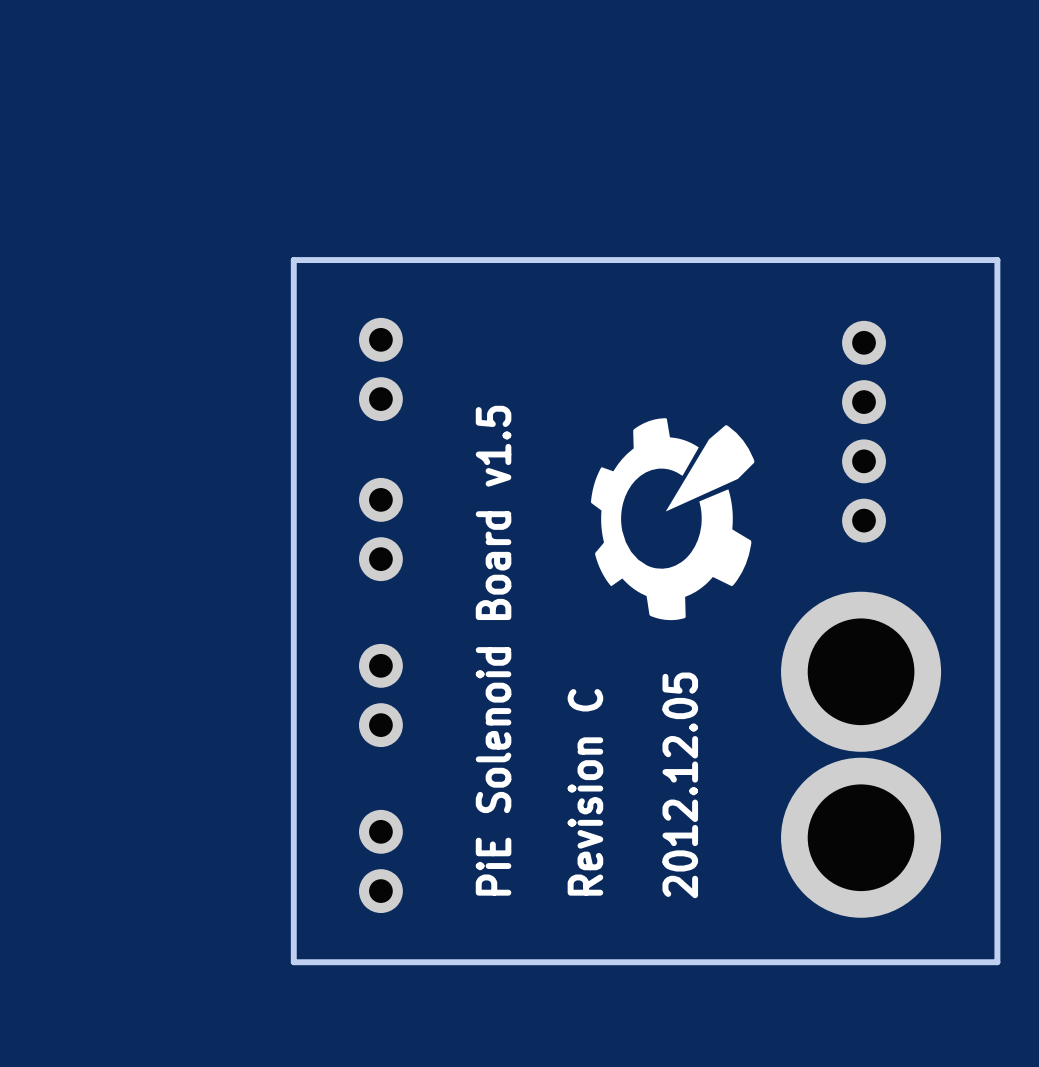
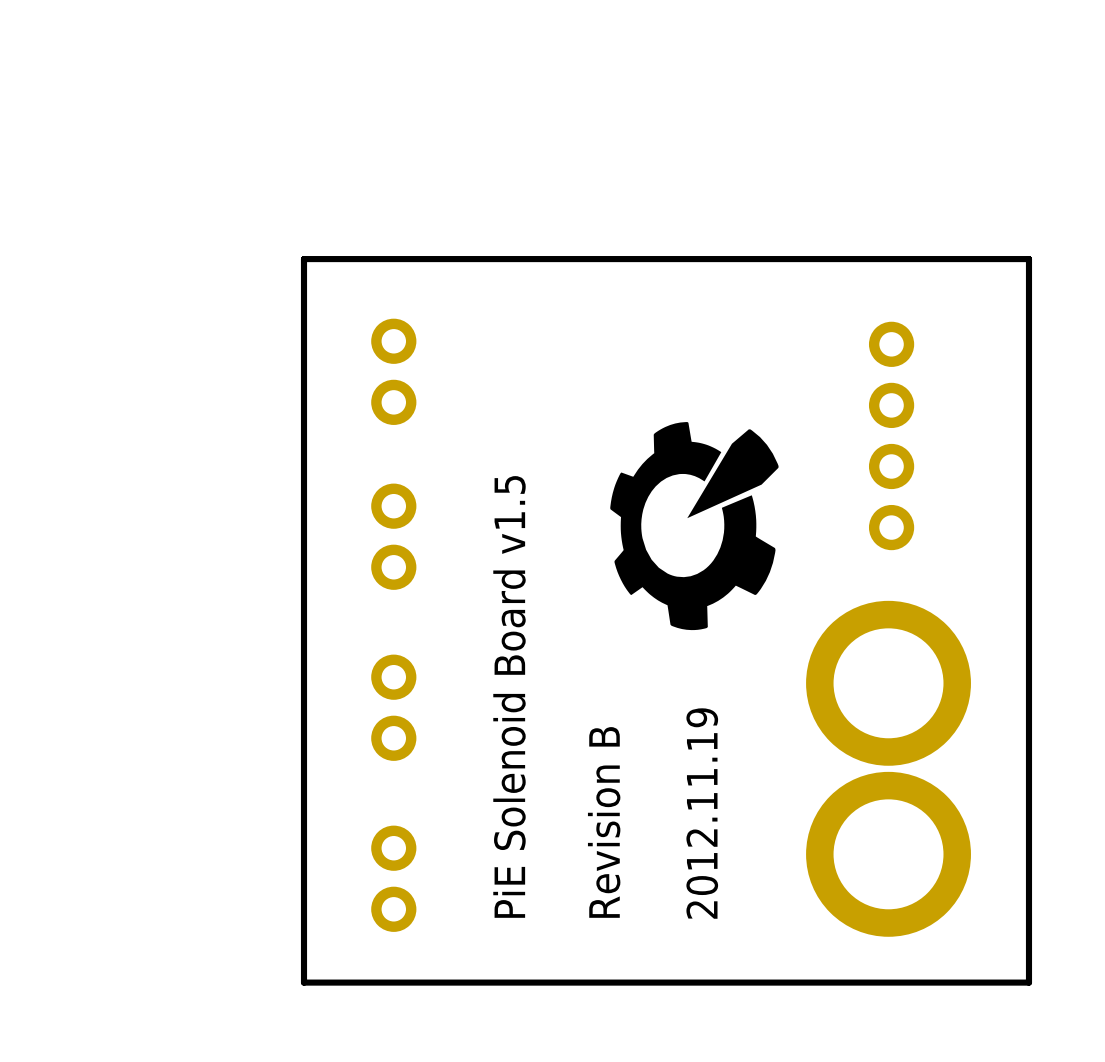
text: 2012.12.05 (680, 785) -> 2012.11.19 (702, 813)
text: Revision C (585, 792) -> Revision B (604, 822)

